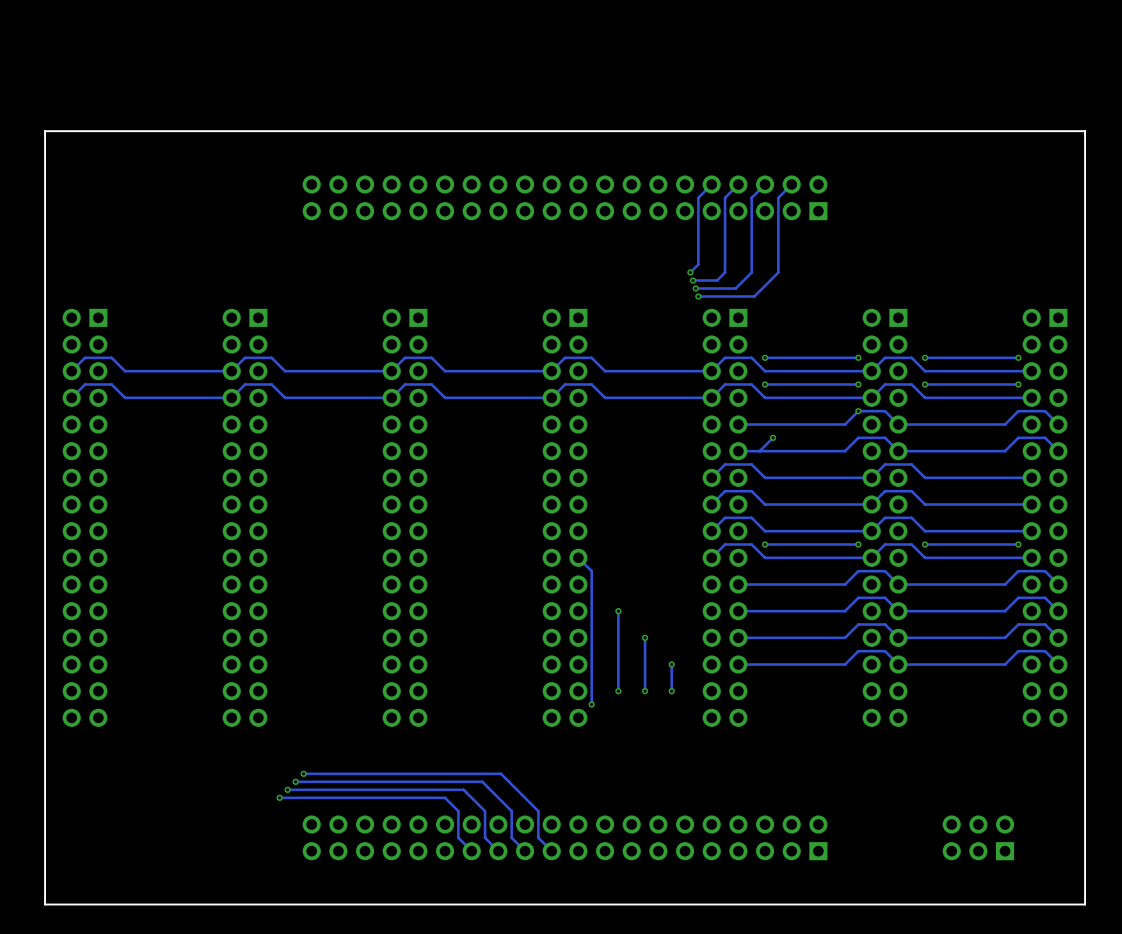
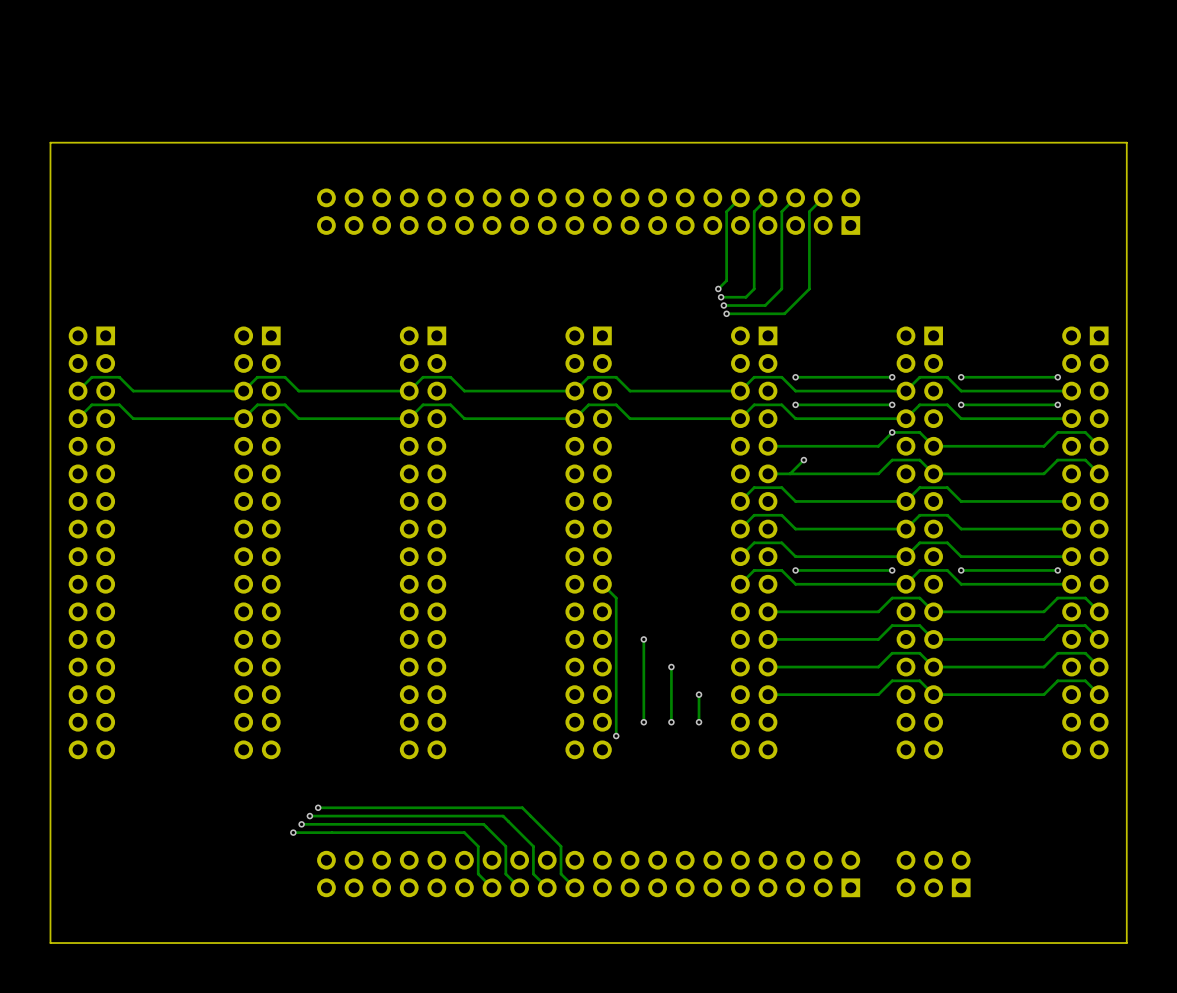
part position: (978, 837) -> (933, 874)

